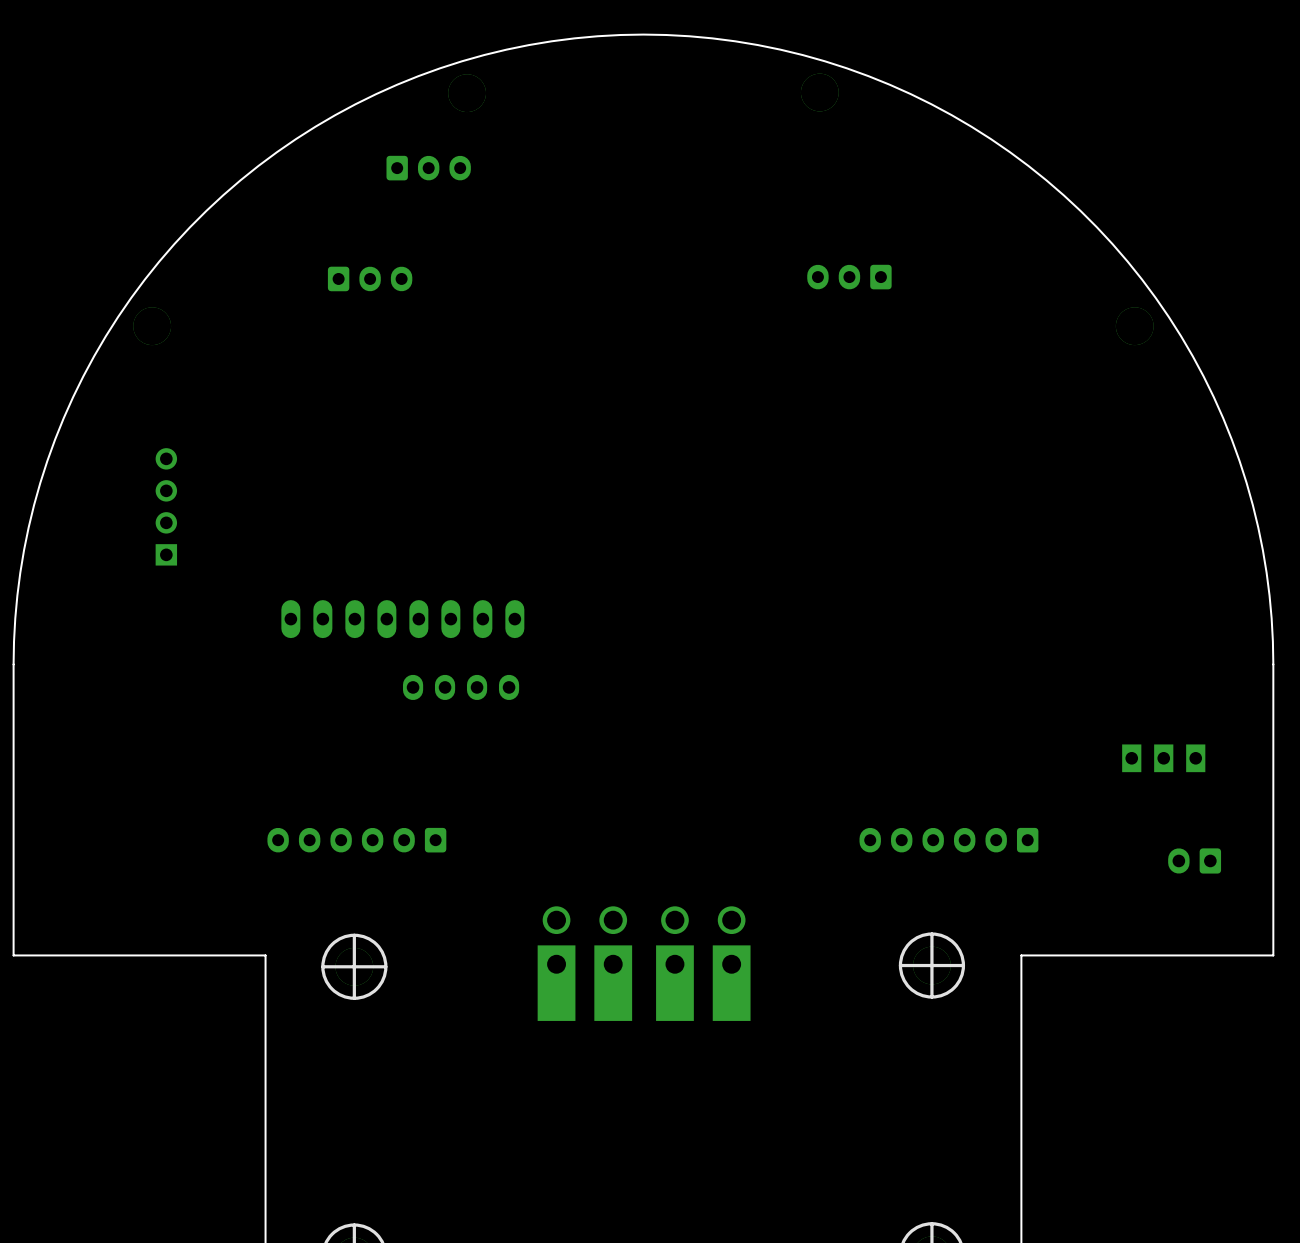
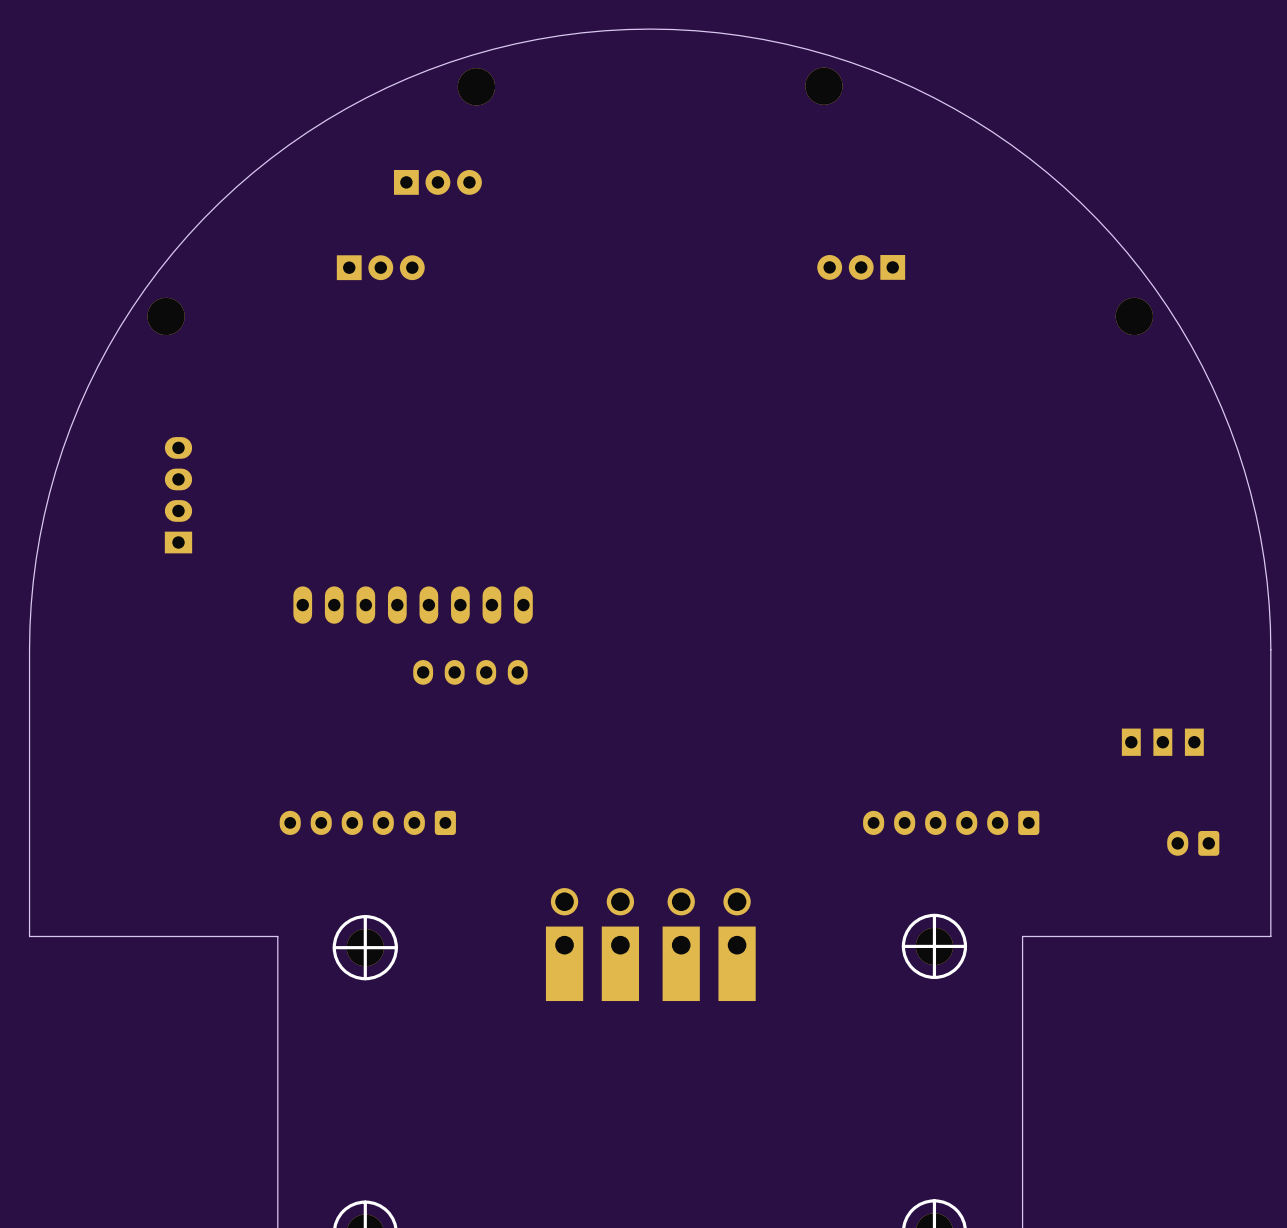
part: (428, 168) -> none
part: none -> (437, 182)
part footprint: [807, 264, 892, 290] -> [817, 255, 906, 280]
part footprint: [327, 266, 413, 292] -> [336, 255, 425, 281]
part footprint: [155, 448, 178, 566] -> [164, 437, 193, 554]

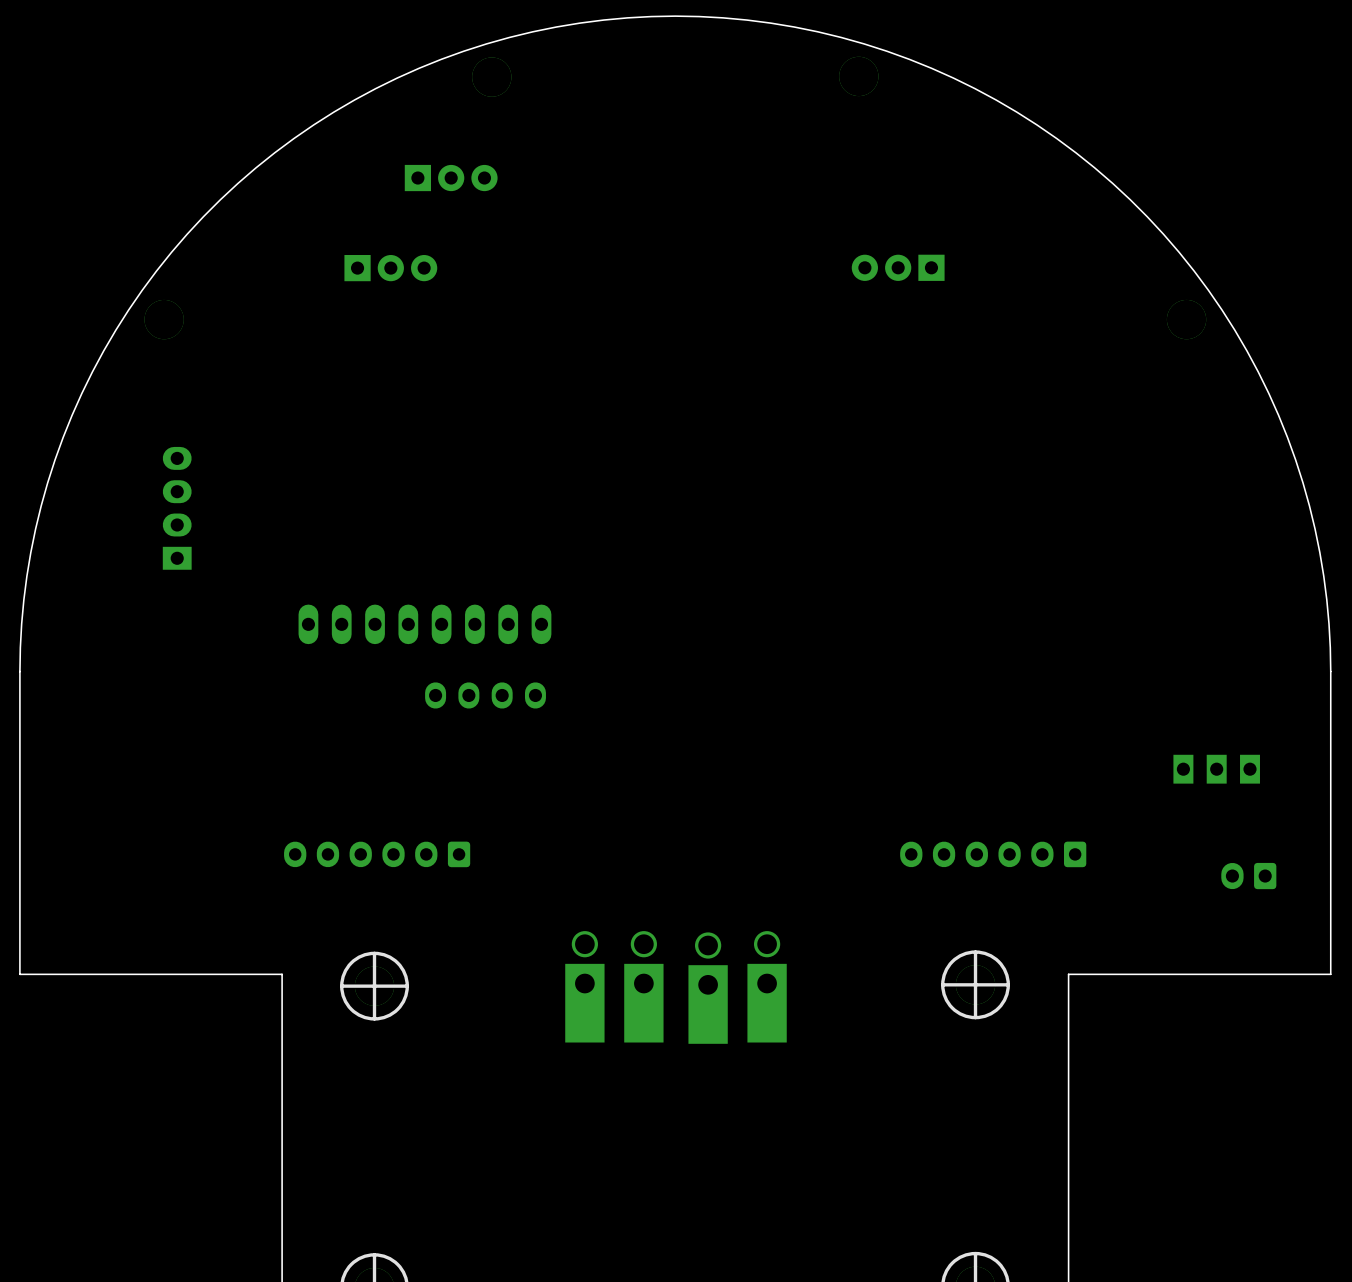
part footprint: [545, 888, 584, 1002] -> [565, 931, 605, 1043]
part footprint: [601, 888, 640, 1002] -> [624, 931, 664, 1043]
part footprint: [662, 888, 700, 1002] -> [688, 932, 728, 1044]
part footprint: [718, 888, 756, 1002] -> [747, 931, 787, 1043]

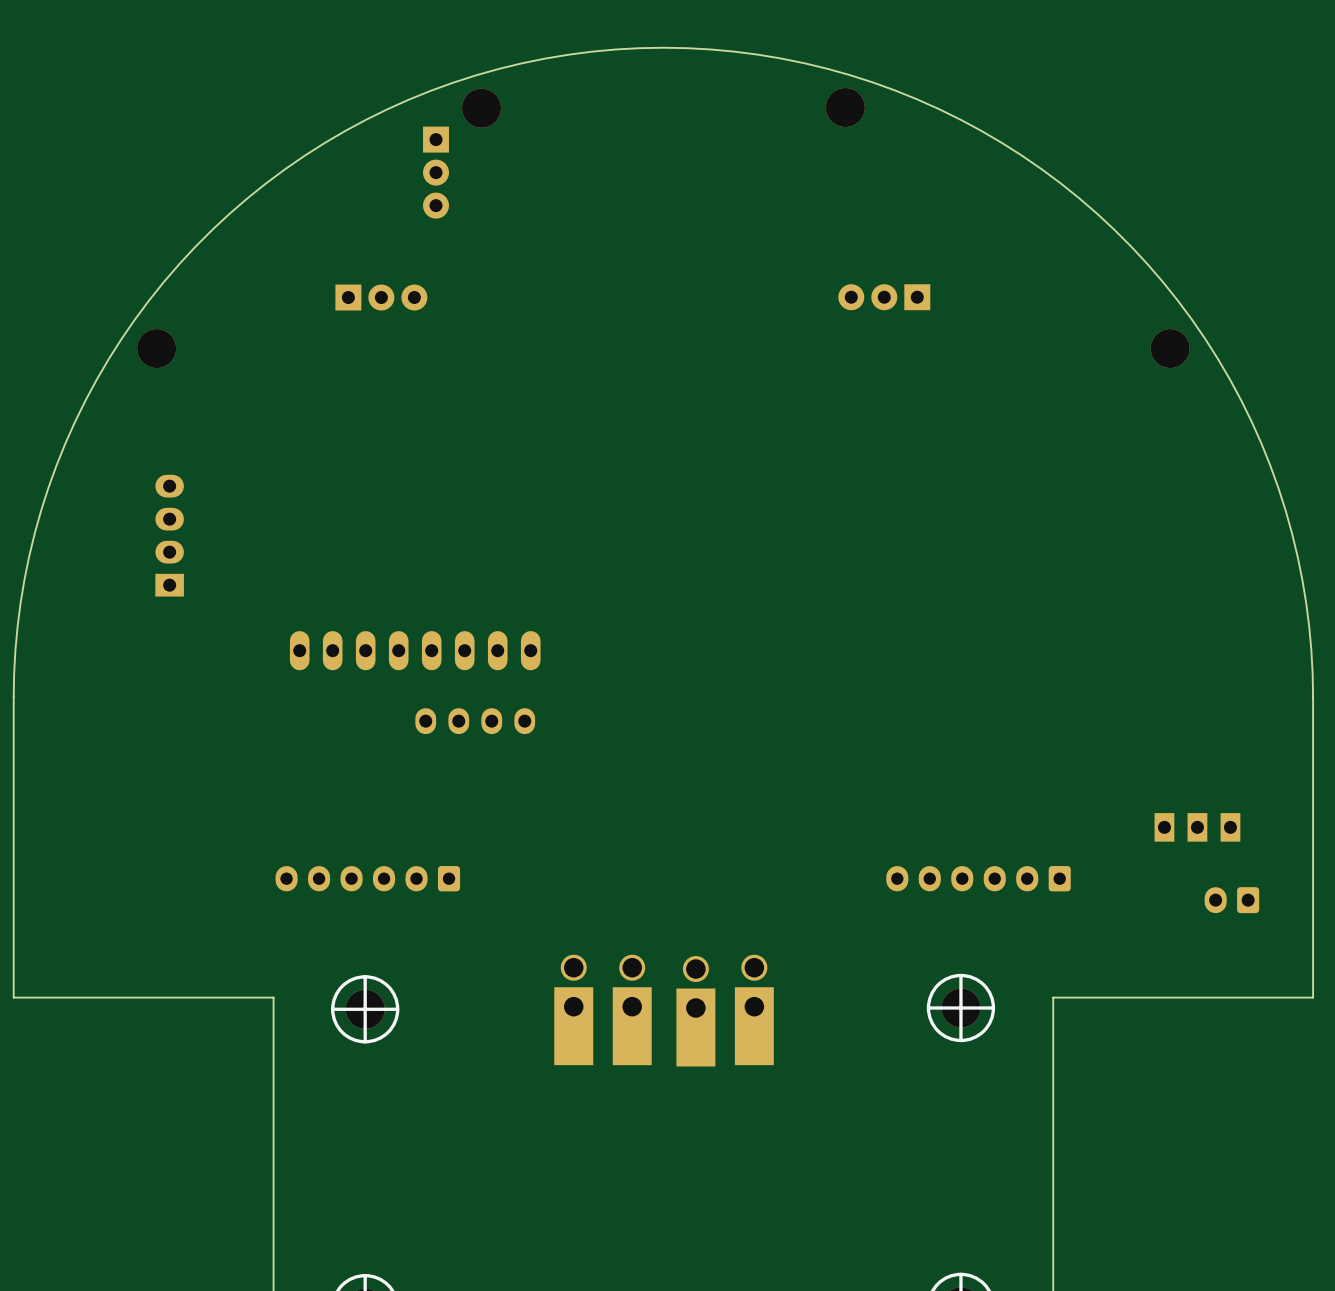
part rotation: 0° (451, 178) -> 90° clockwise (436, 172)
part position: (1216, 769) -> (1197, 827)

